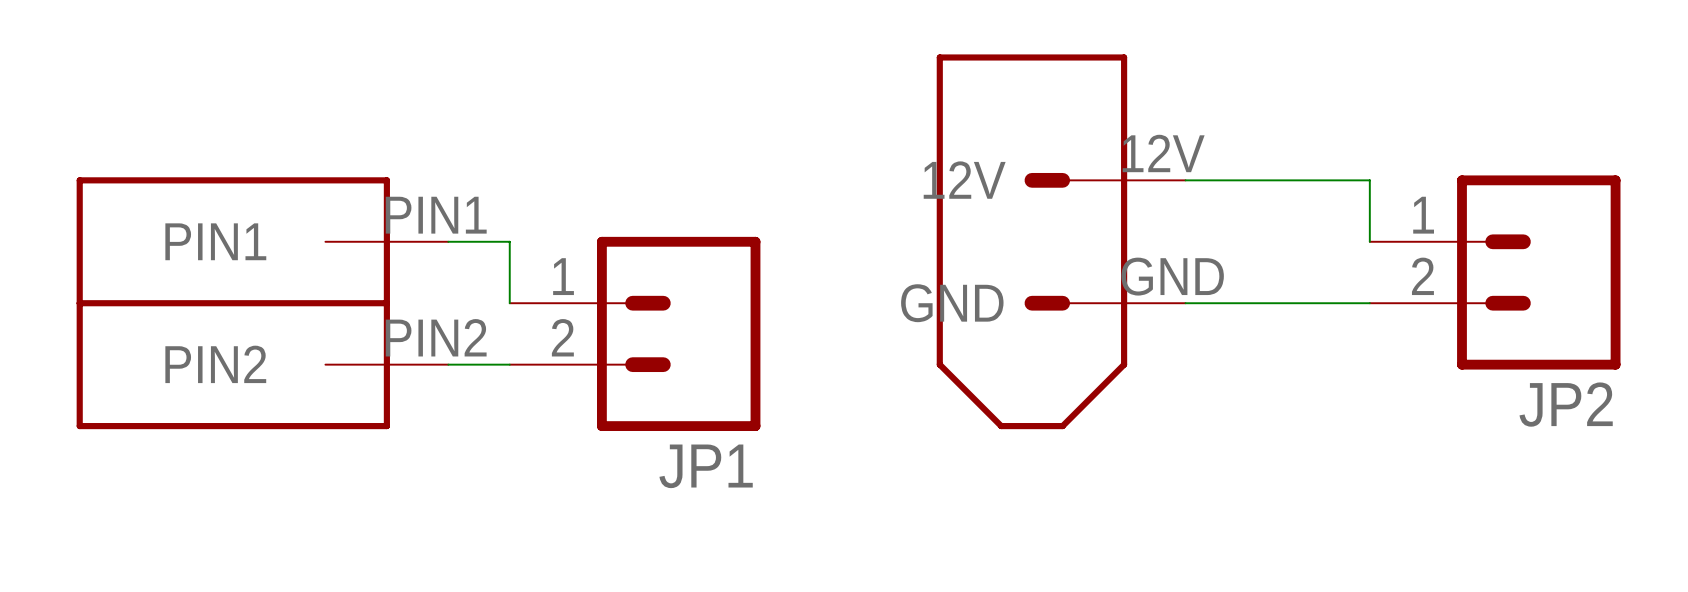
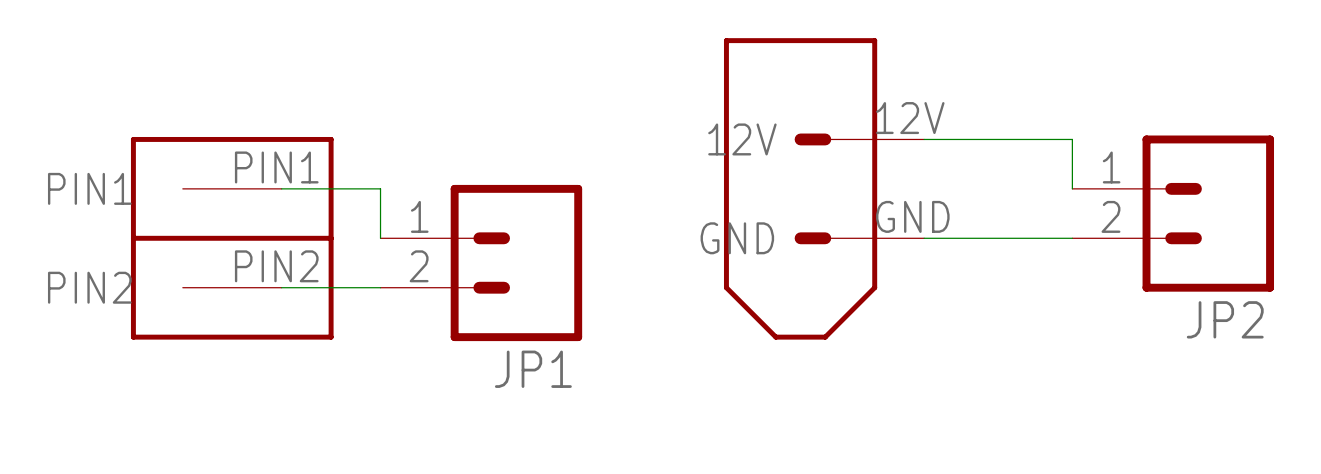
part: (262, 303) -> none
part: none -> (232, 238)

